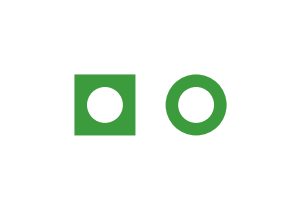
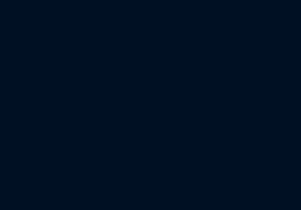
part: (150, 104) -> none

